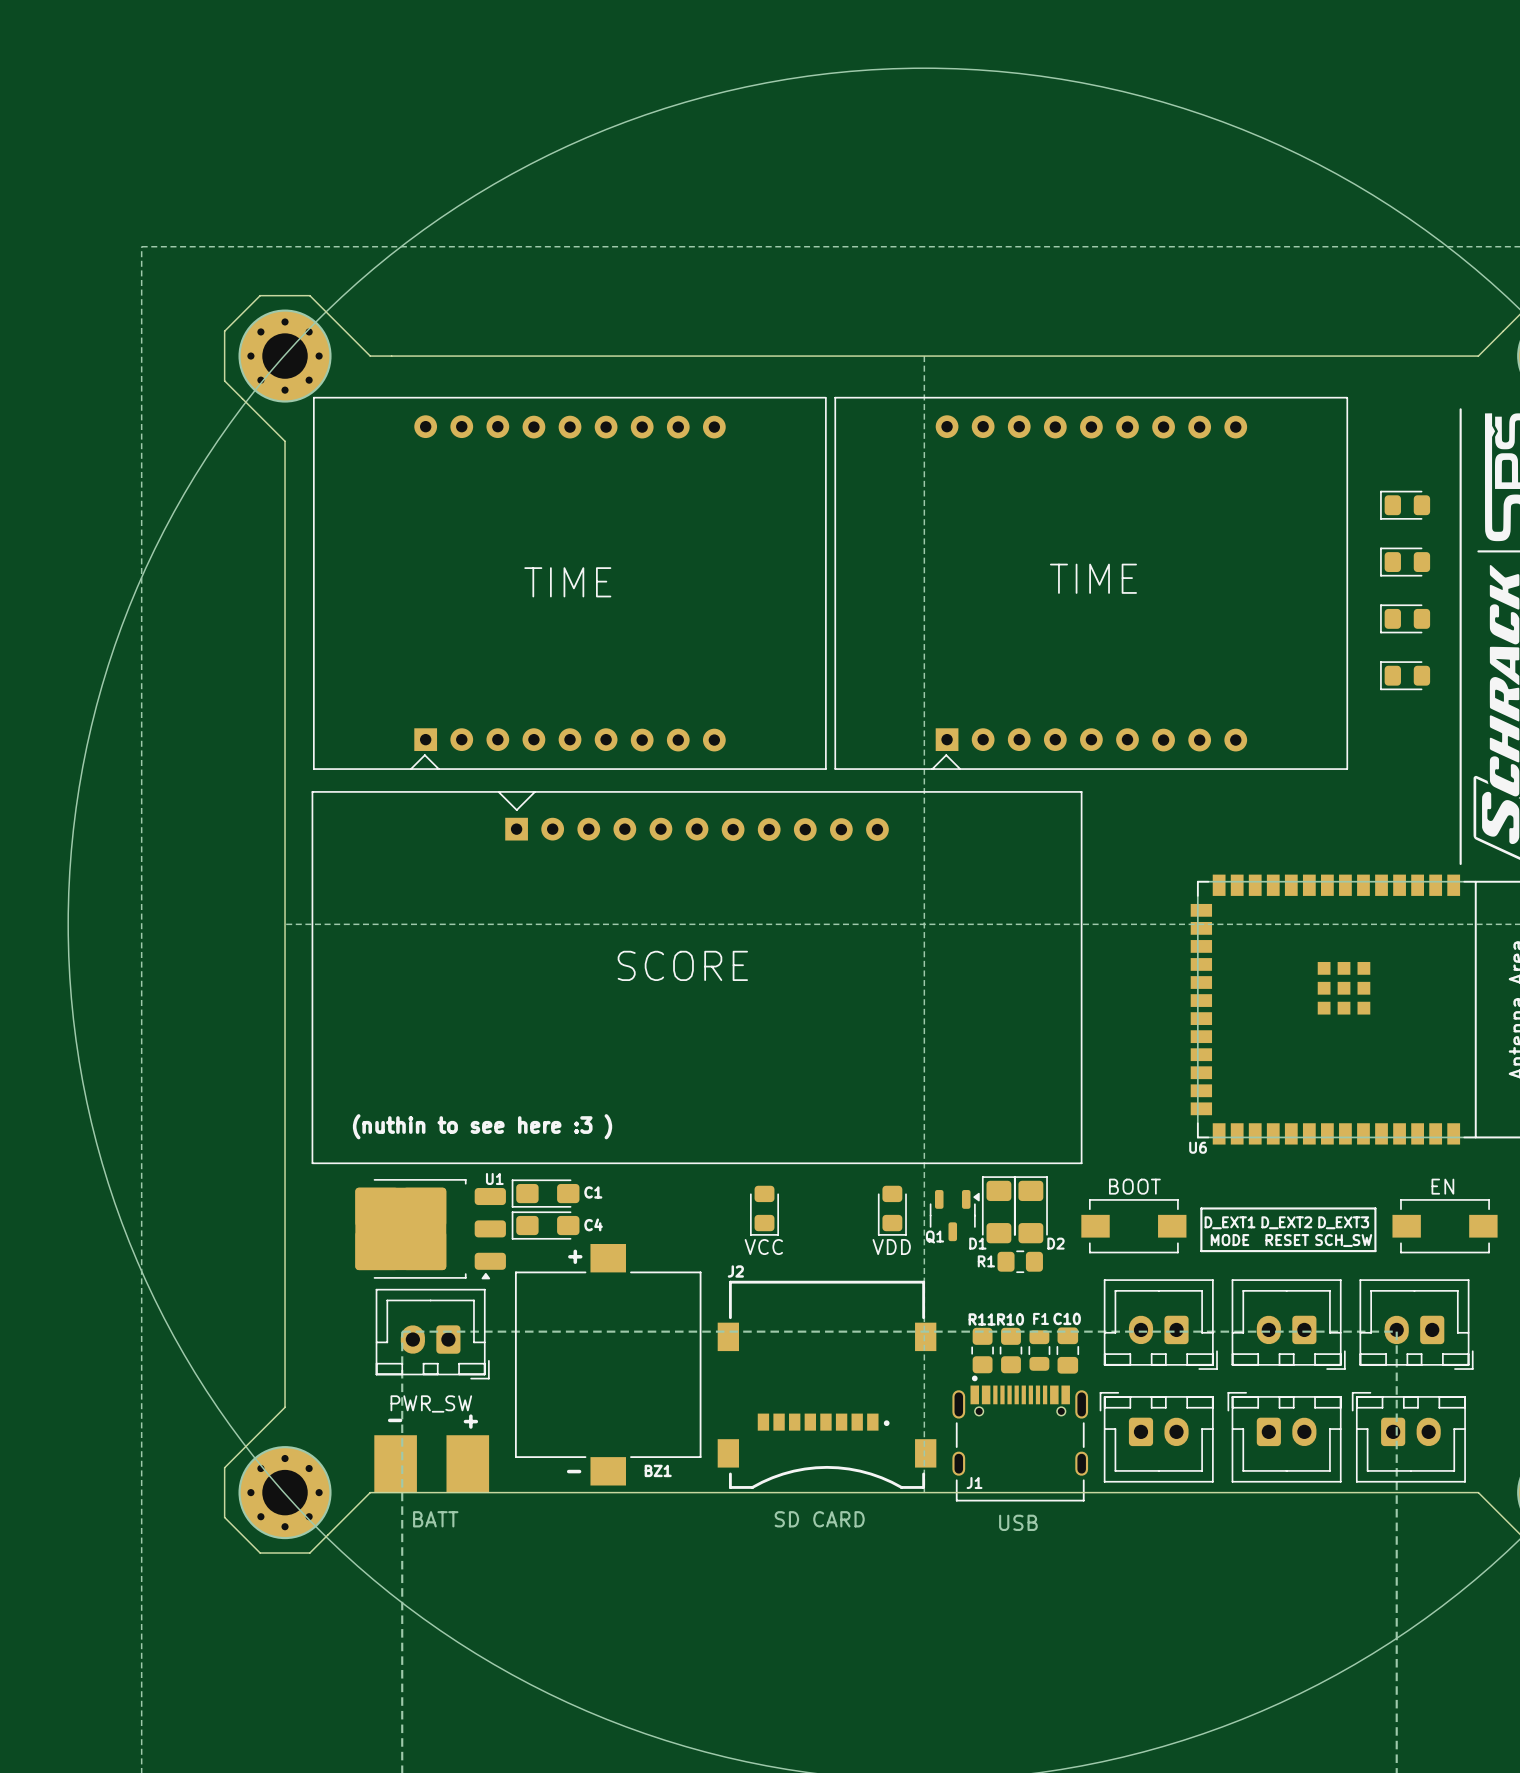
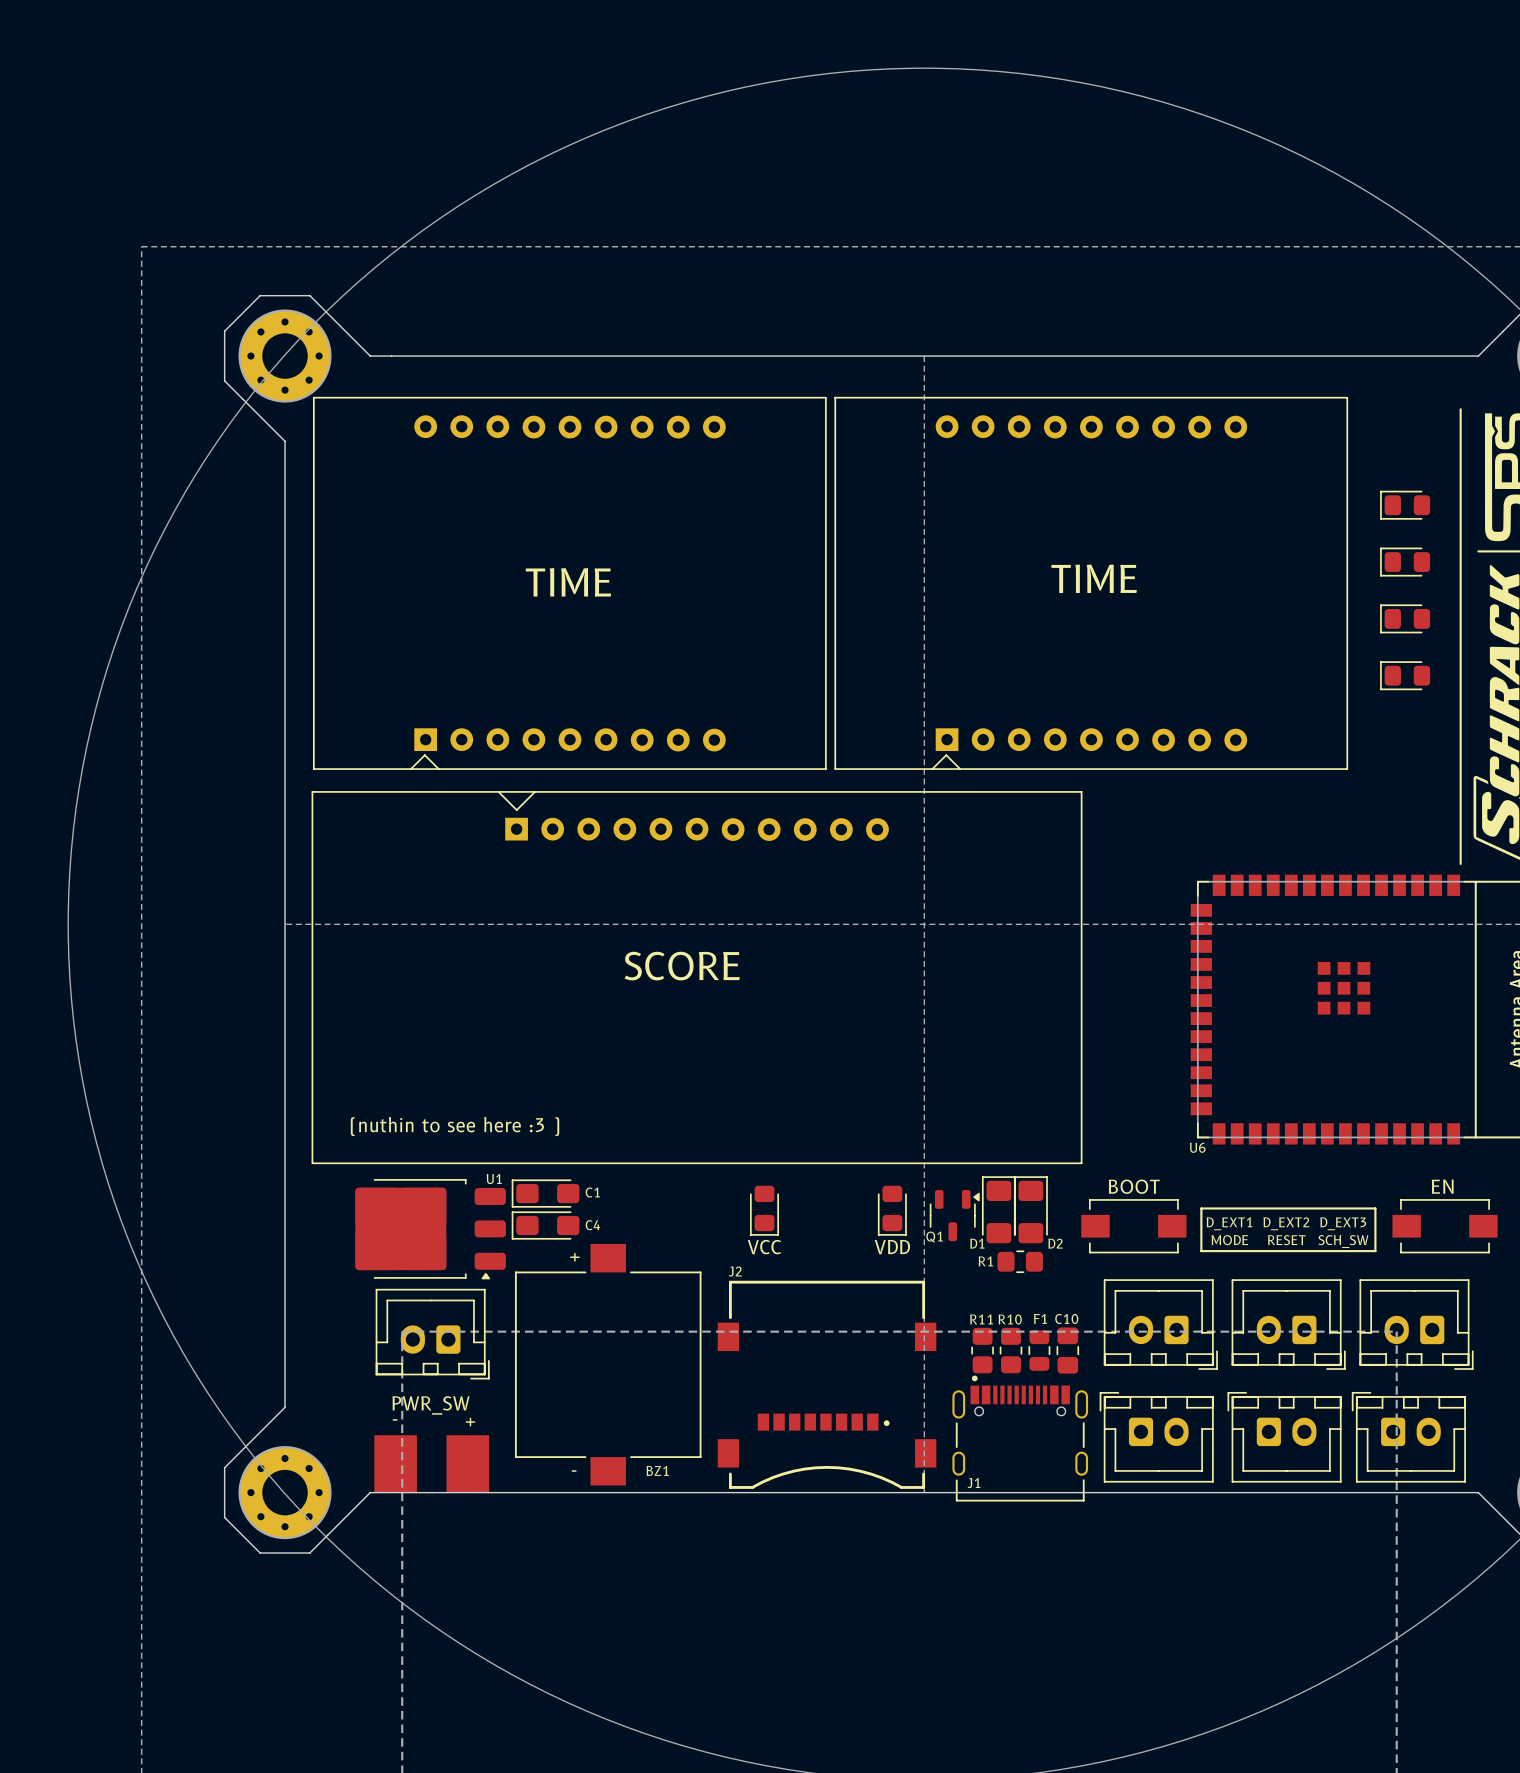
text: BATT (435, 1519) -> none
text: SD CARD (819, 1519) -> none
text: USB (1018, 1522) -> none

